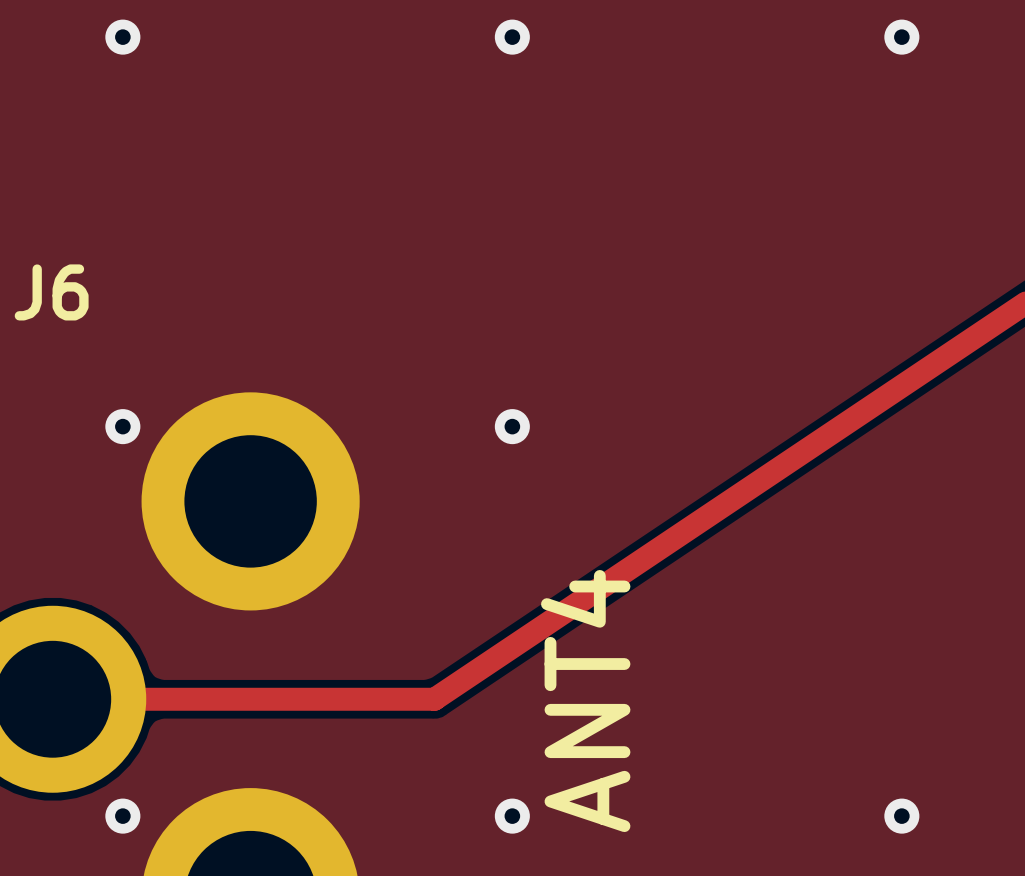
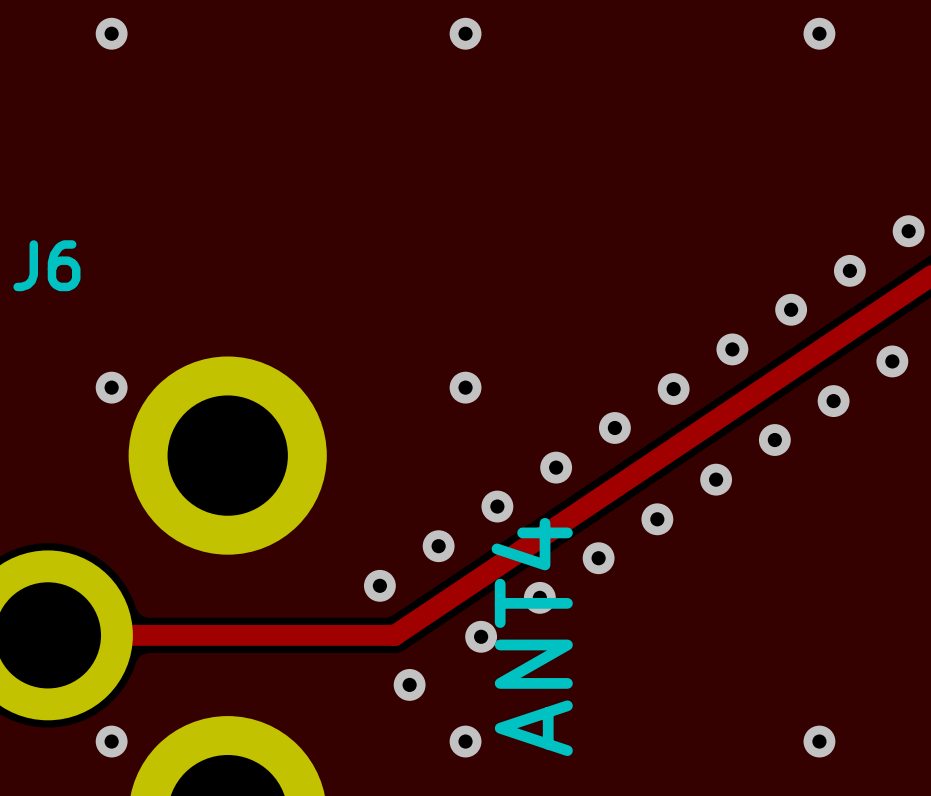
via: none -> (908, 231)
via: none -> (849, 270)
via: none -> (791, 309)
via: none -> (732, 349)
via: none -> (892, 361)
via: none -> (673, 389)
via: none -> (833, 401)
via: none -> (614, 427)
via: none -> (774, 440)
via: none -> (556, 467)
via: none -> (716, 479)
via: none -> (497, 506)
via: none -> (657, 519)
via: none -> (438, 546)
via: none -> (598, 558)
via: none -> (379, 585)
via: none -> (539, 597)
via: none -> (481, 636)
via: none -> (409, 684)

